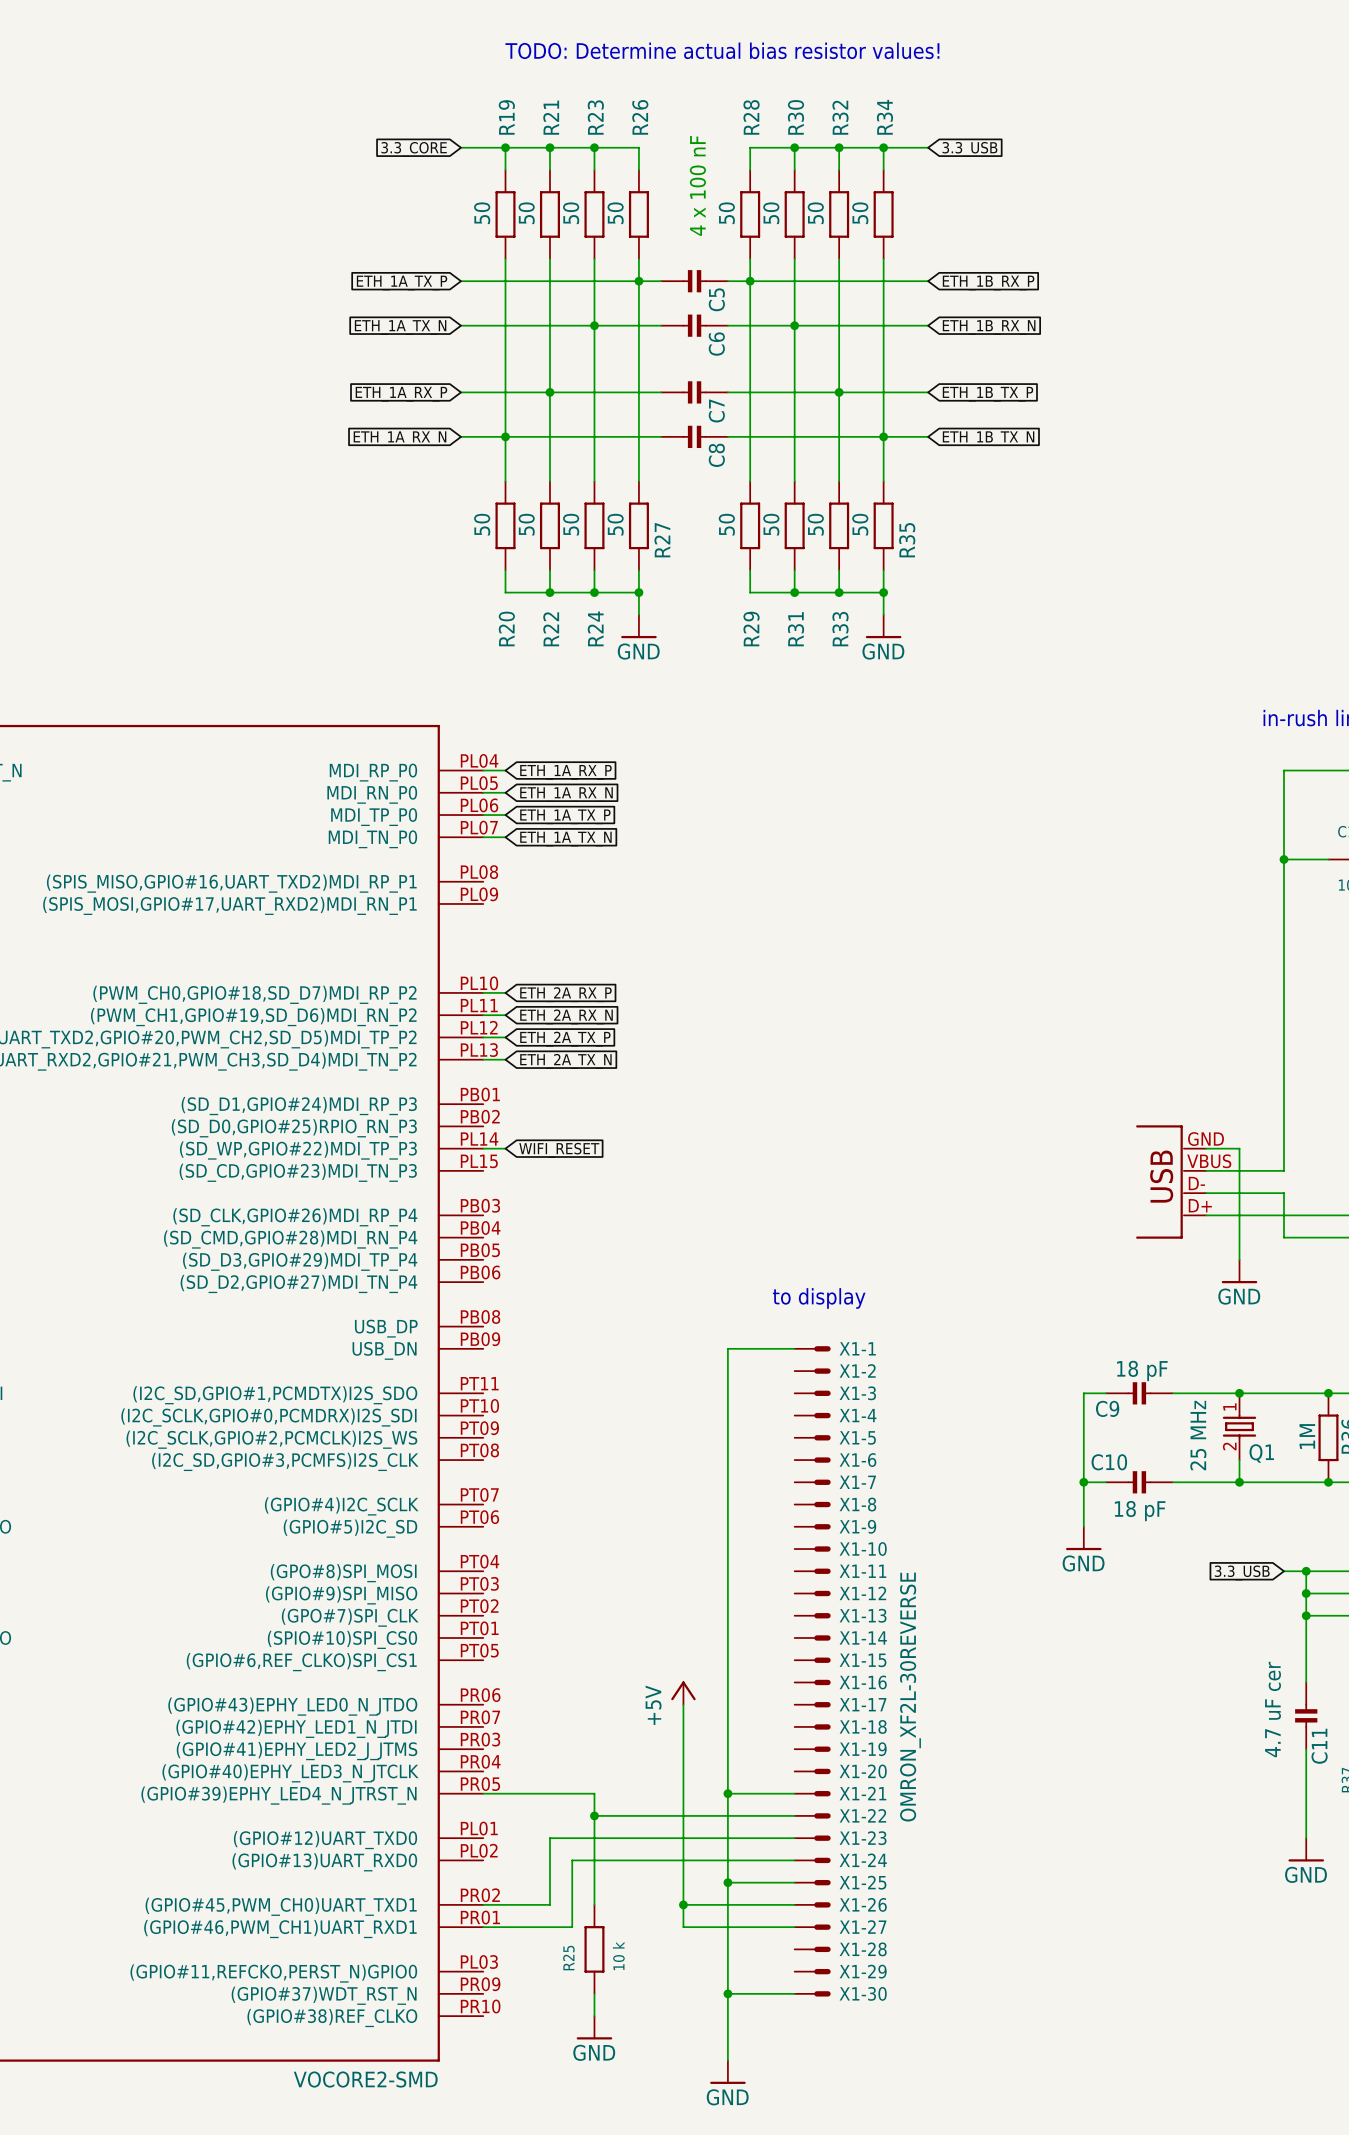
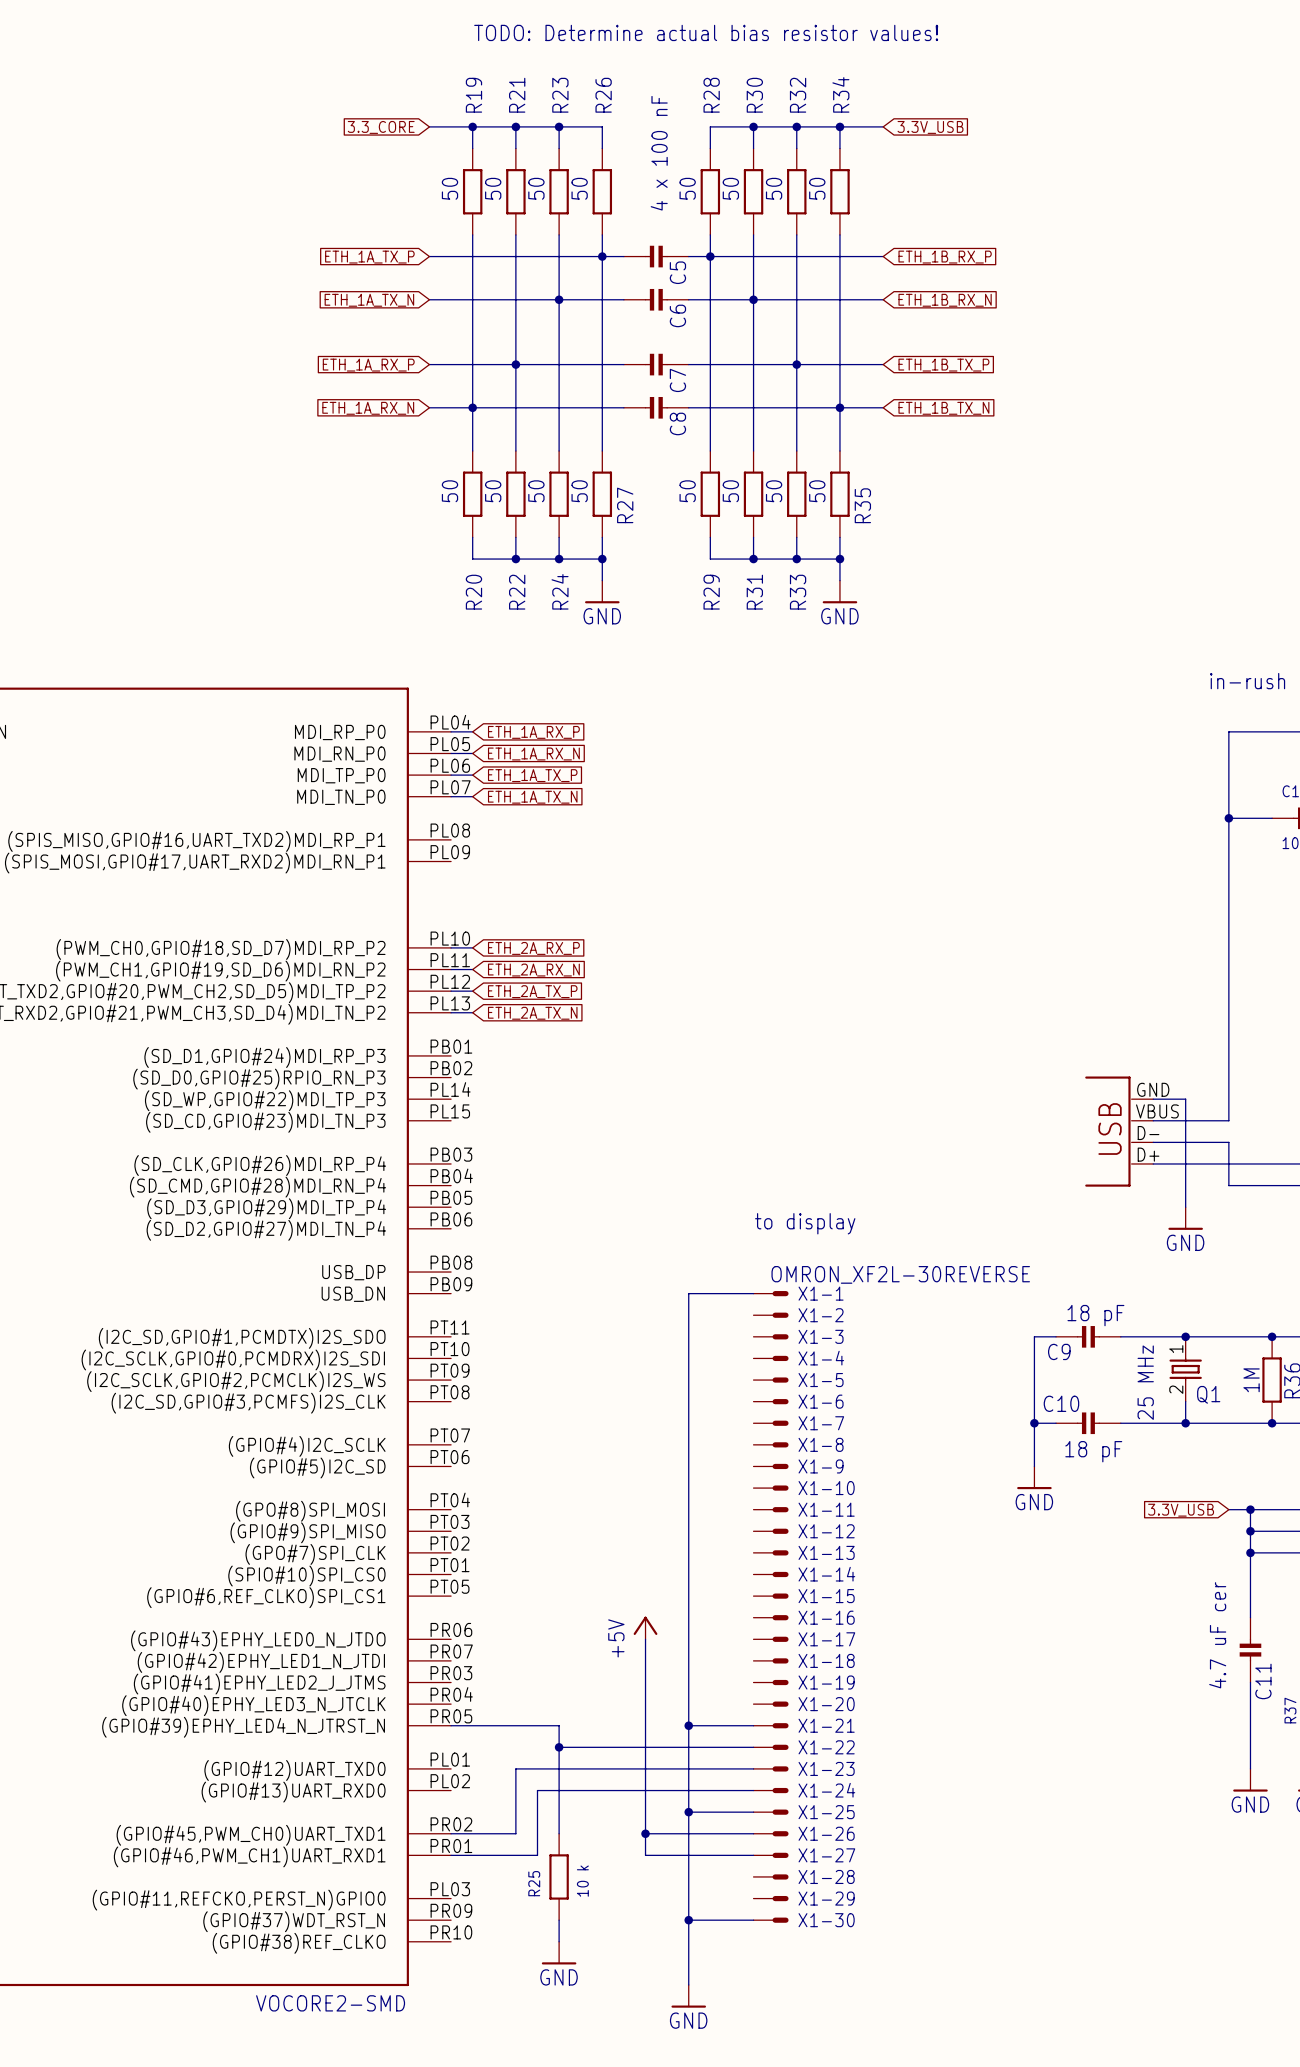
global label: 3.3_USB (969, 149) -> 3.3V_USB (930, 127)
wire: (483, 1148) (505, 1148) -> none
global label: WIFI_RESET (559, 1150) -> none
text position: to display (819, 1298) -> to display (805, 1223)
global label: 3.3_USB (1242, 1572) -> 3.3V_USB (1181, 1510)
X1-1 value rotation: 0° (910, 1697) -> 90° clockwise (900, 1274)
X1-1 value position: OMRON_XF2L-30REVERSE (910, 1697) -> OMRON_XF2L-30REVERSE (900, 1274)

